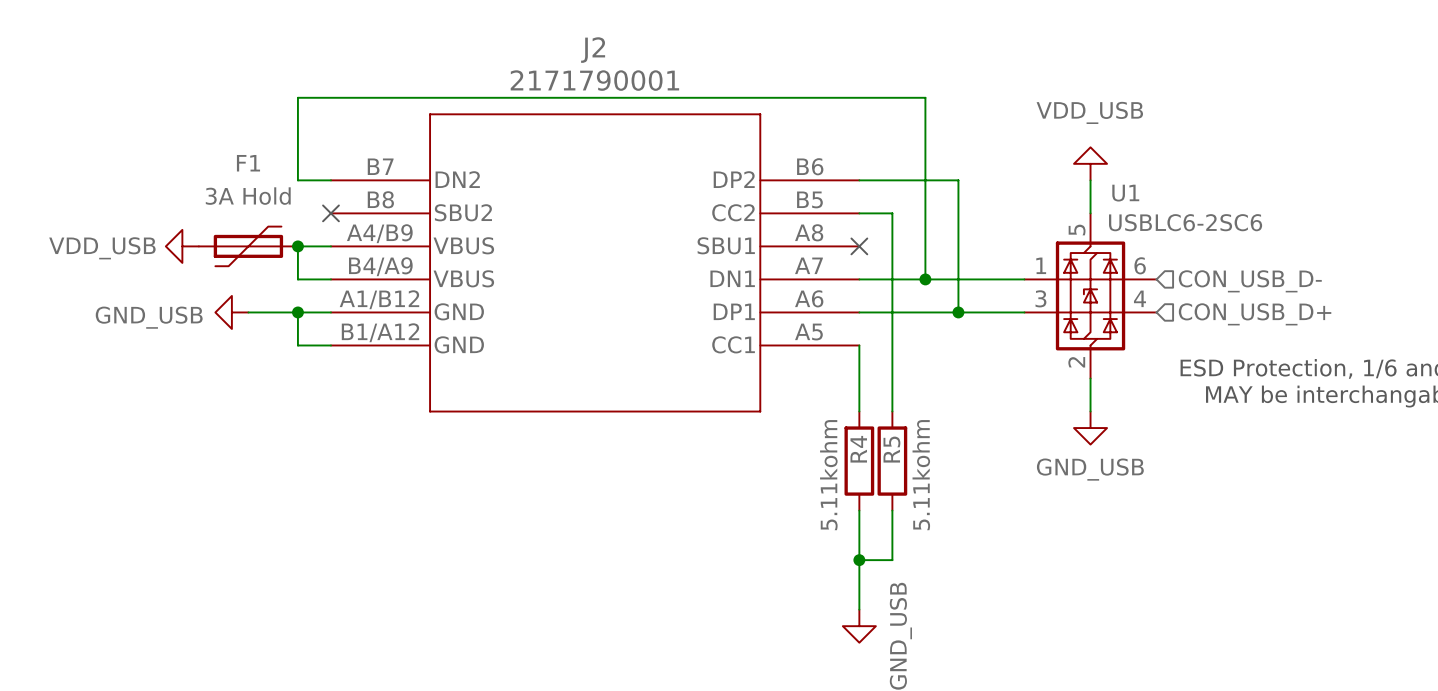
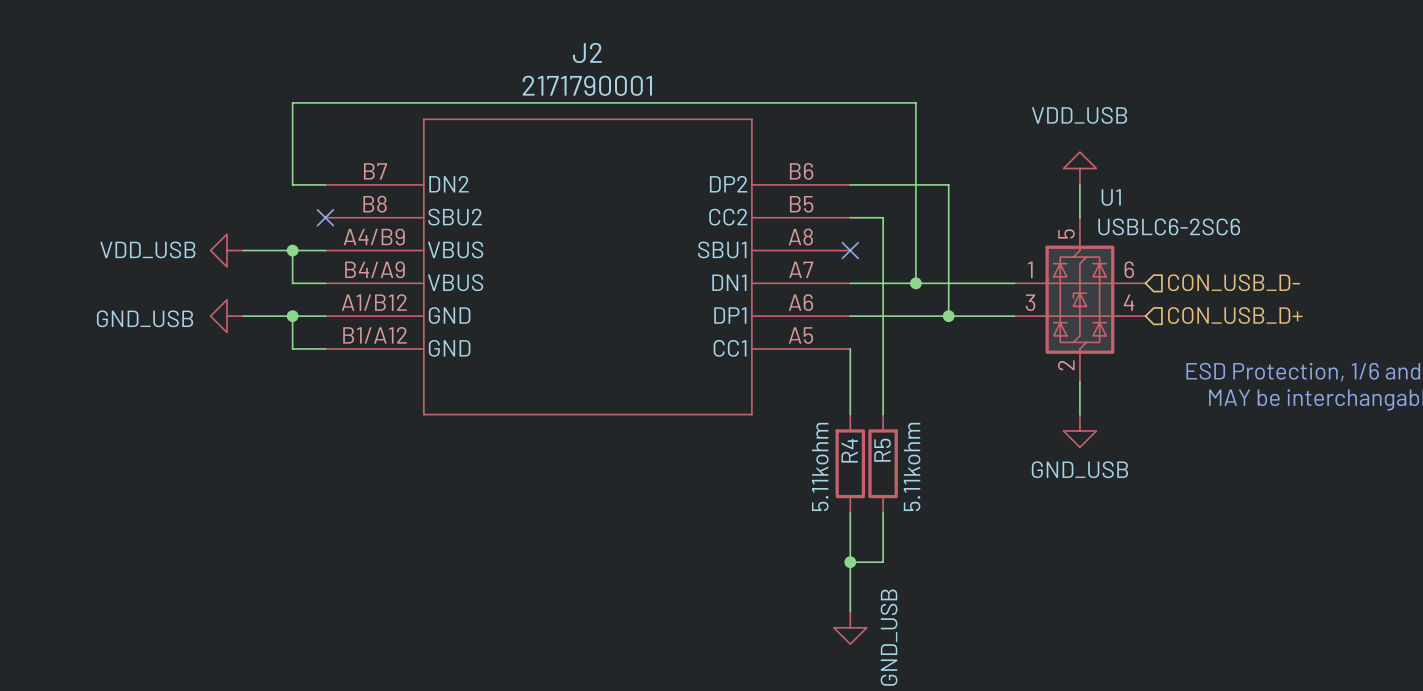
power symbol position: VDD_USB (182, 246) -> VDD_USB (227, 250)
F1: 3A Hold (248, 246) -> none

